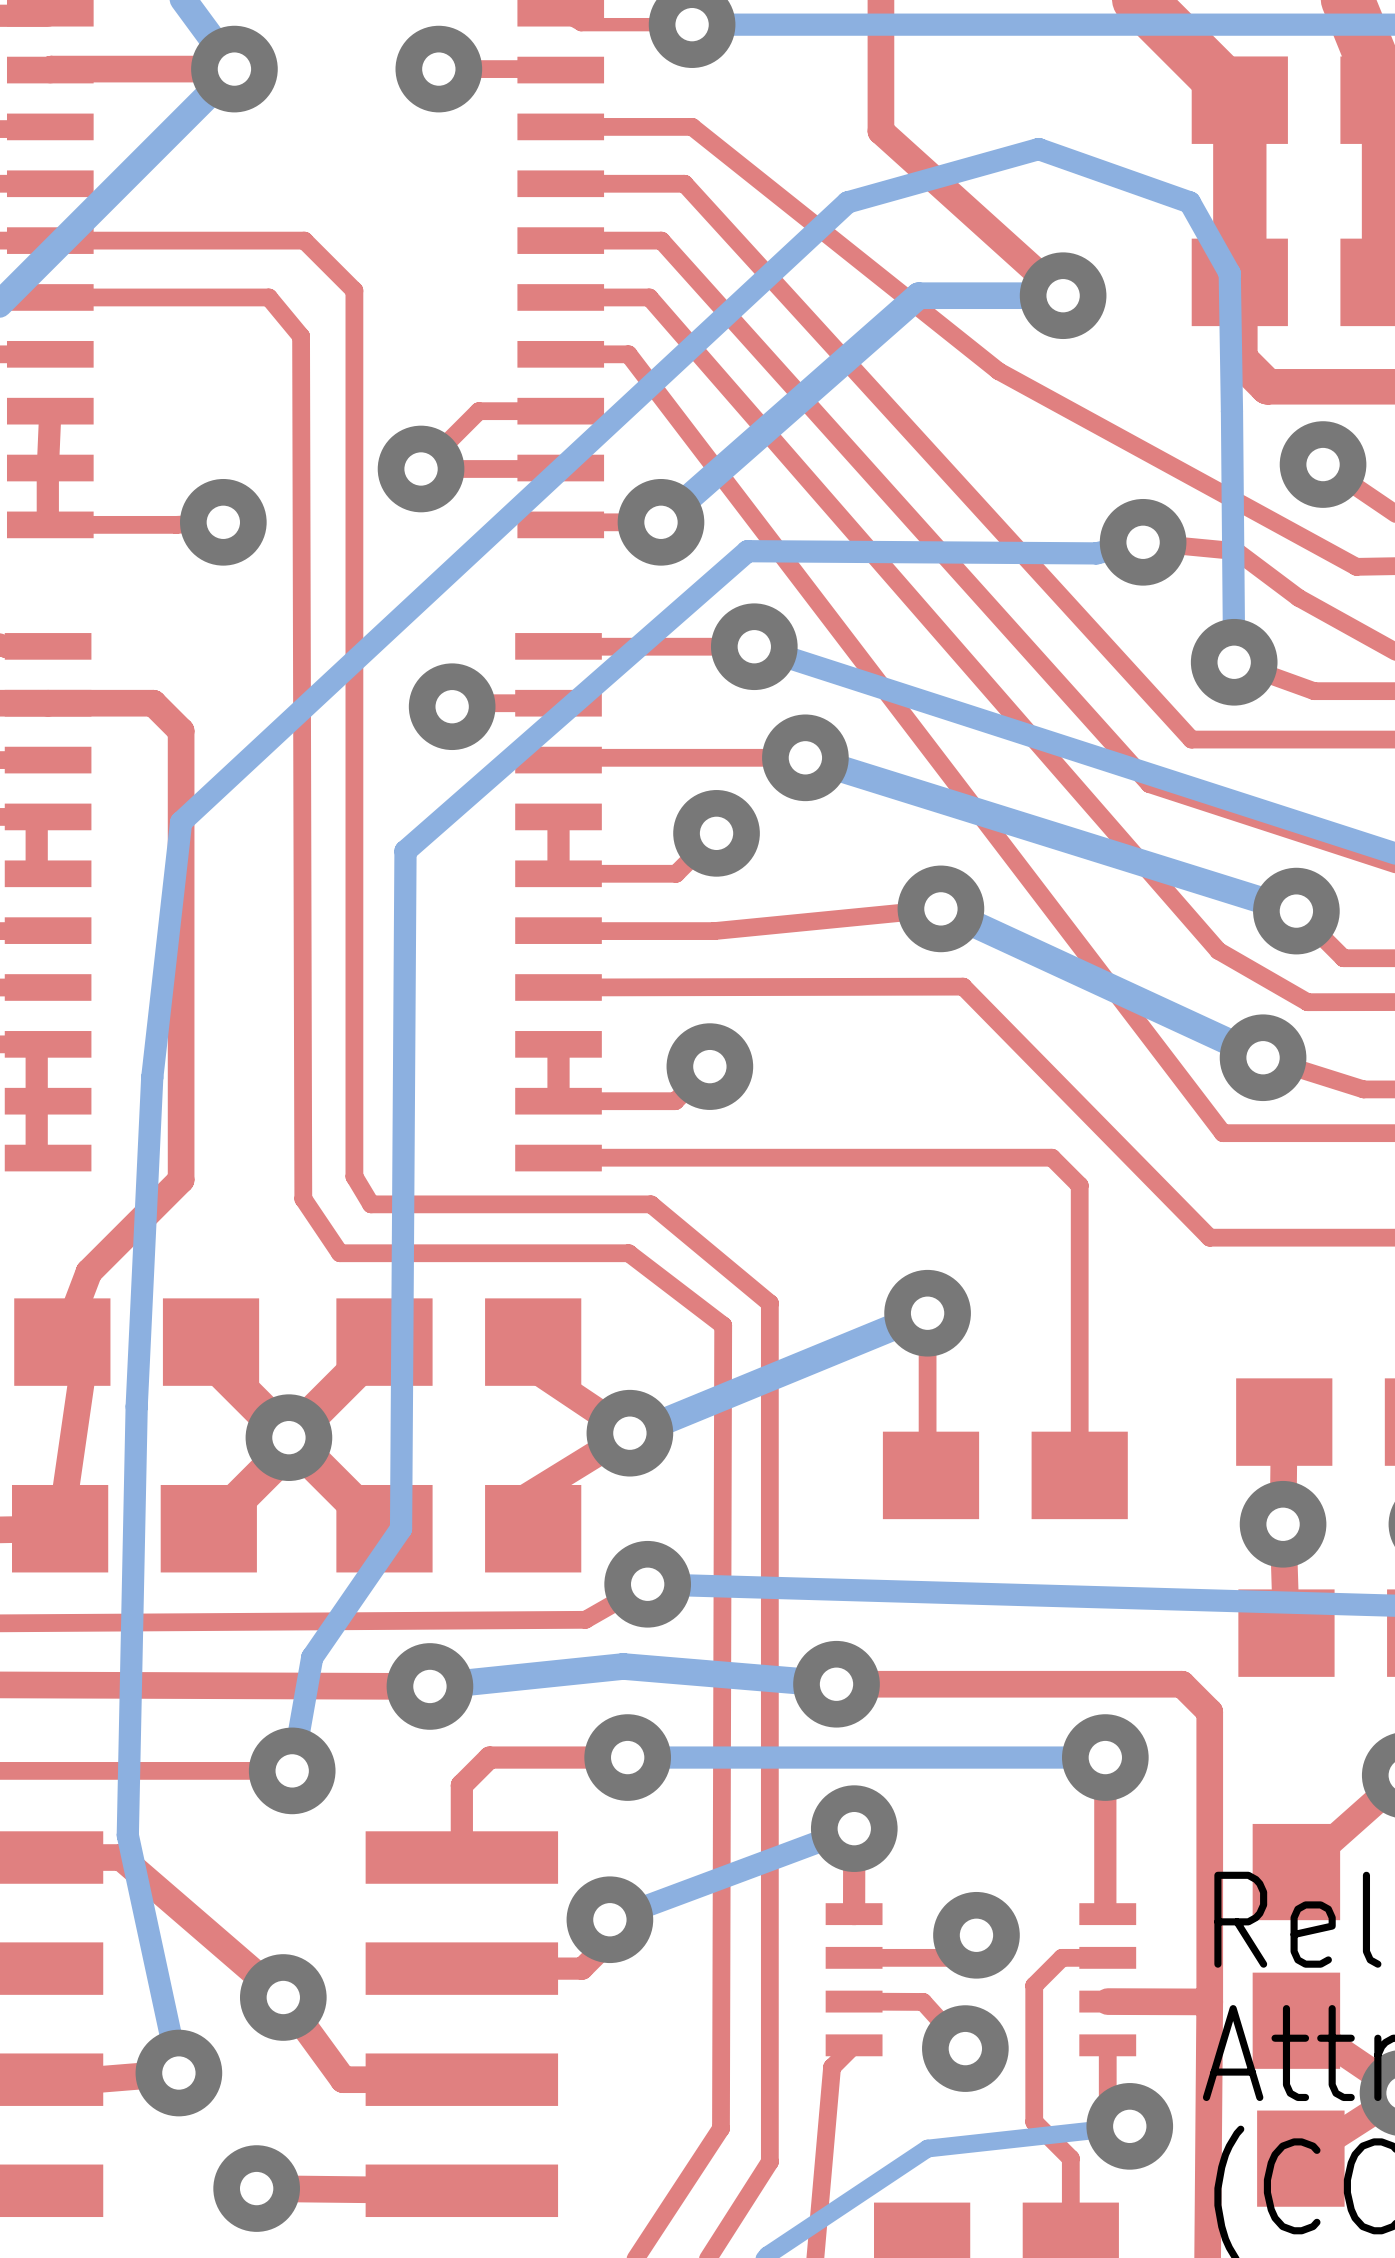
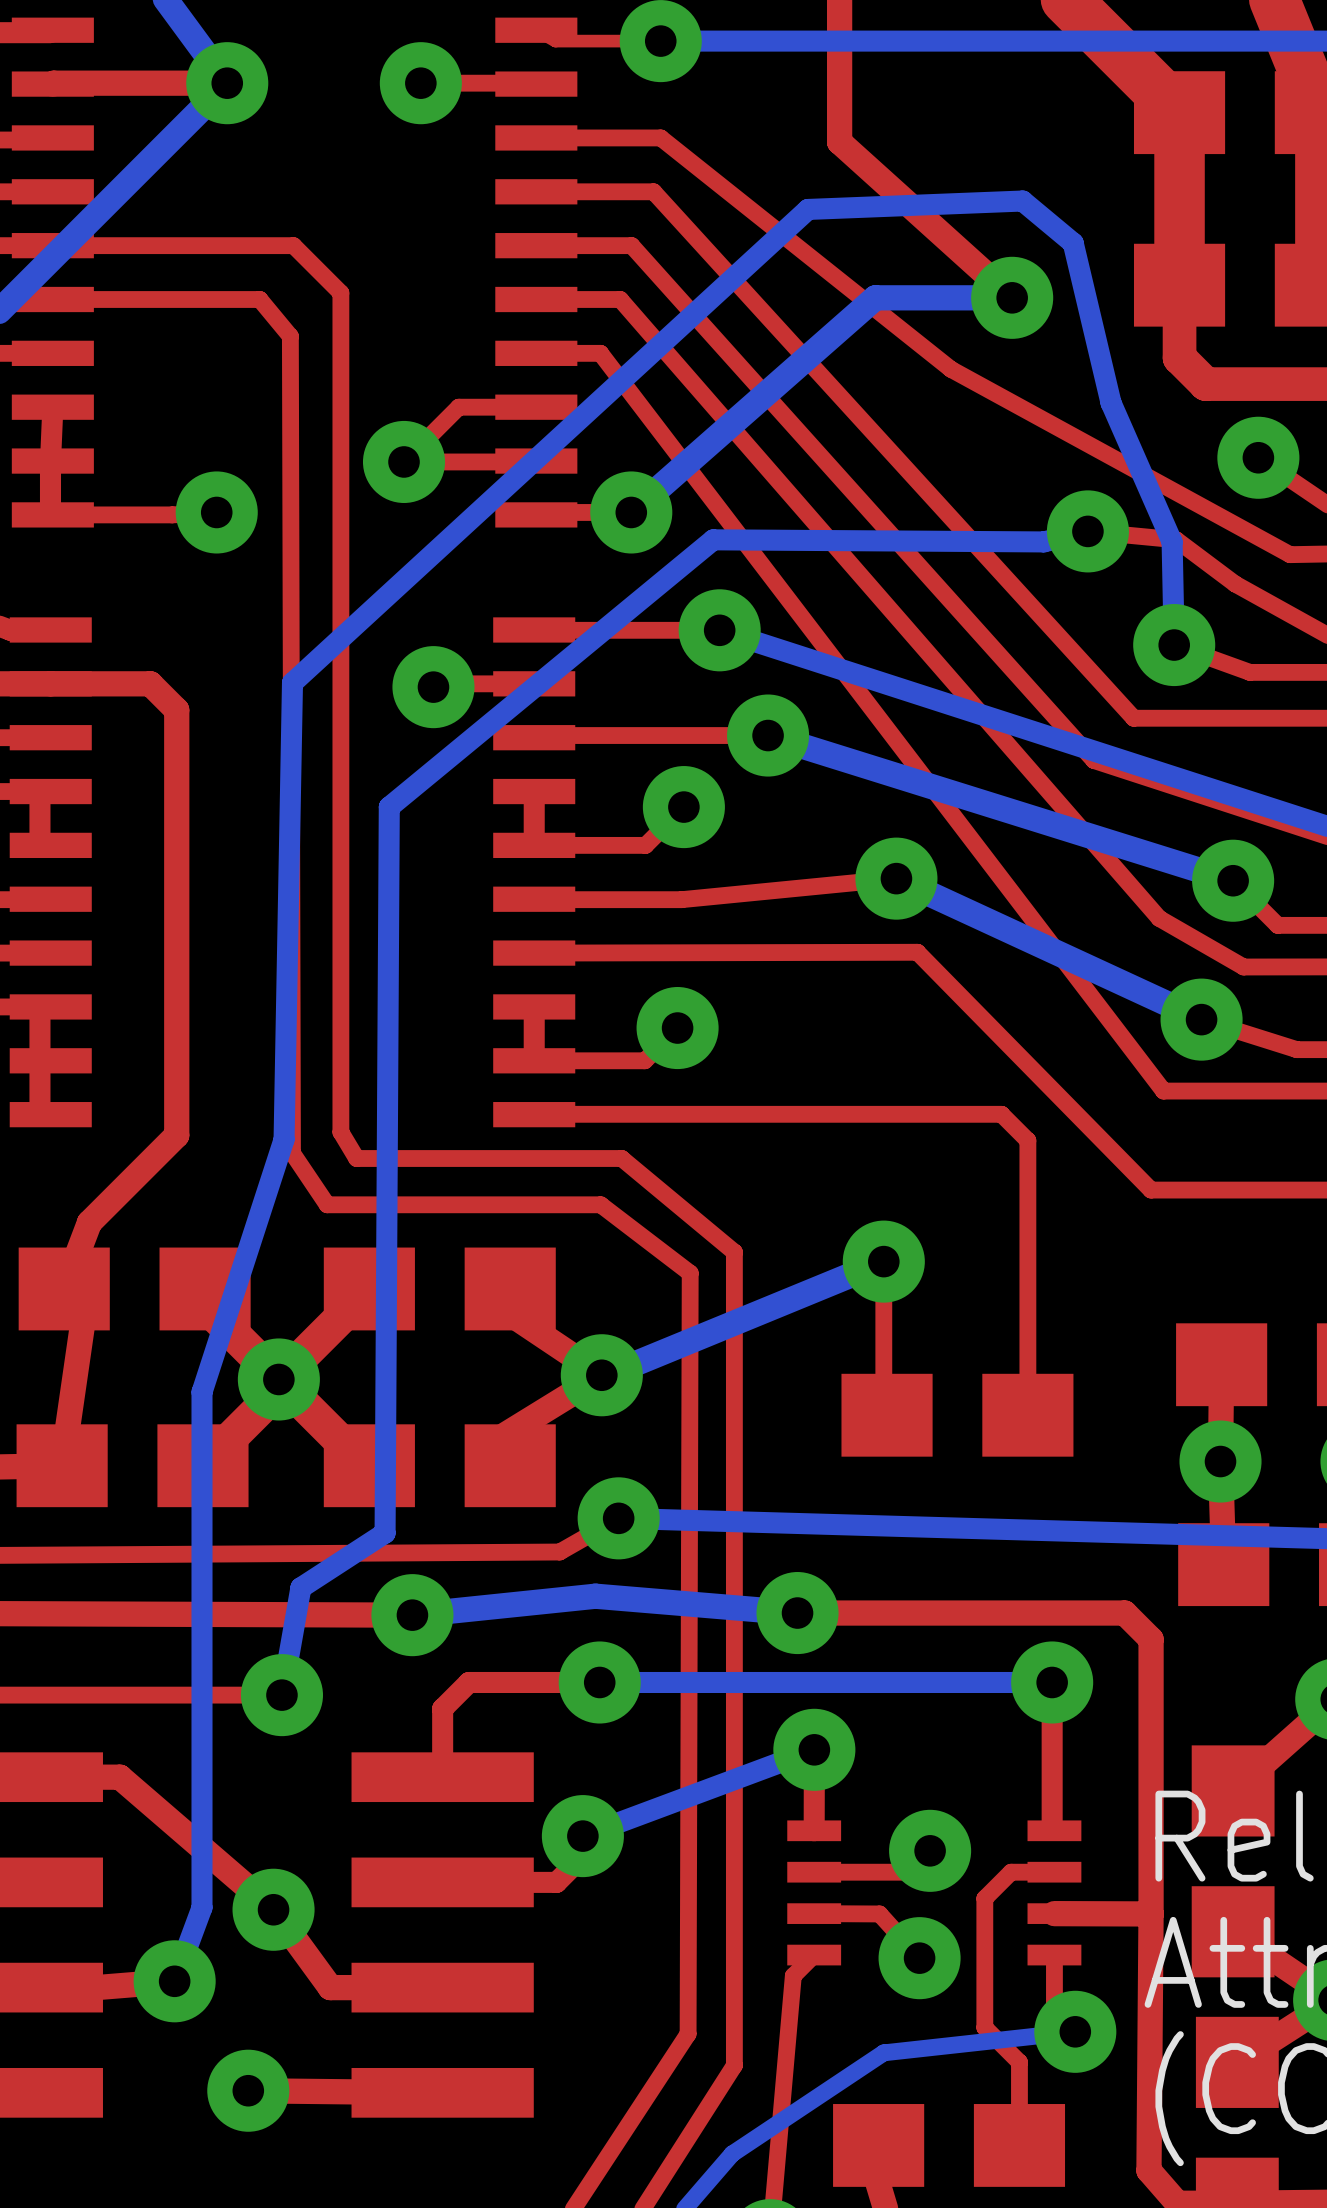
bottom track: (747, 551) (405, 851) (401, 1528) (312, 1657) -> (713, 539) (389, 807) (385, 1533) (300, 1587)
bottom track: (1234, 662) (1229, 273) (1189, 202) (1038, 149) (847, 202) (181, 822) (152, 1077) (136, 1406) (127, 1835) (178, 2073) -> (1174, 645) (1172, 541) (1111, 403) (1073, 243) (1022, 201) (808, 209) (292, 682) (284, 1139) (202, 1392) (202, 1907) (174, 1981)

